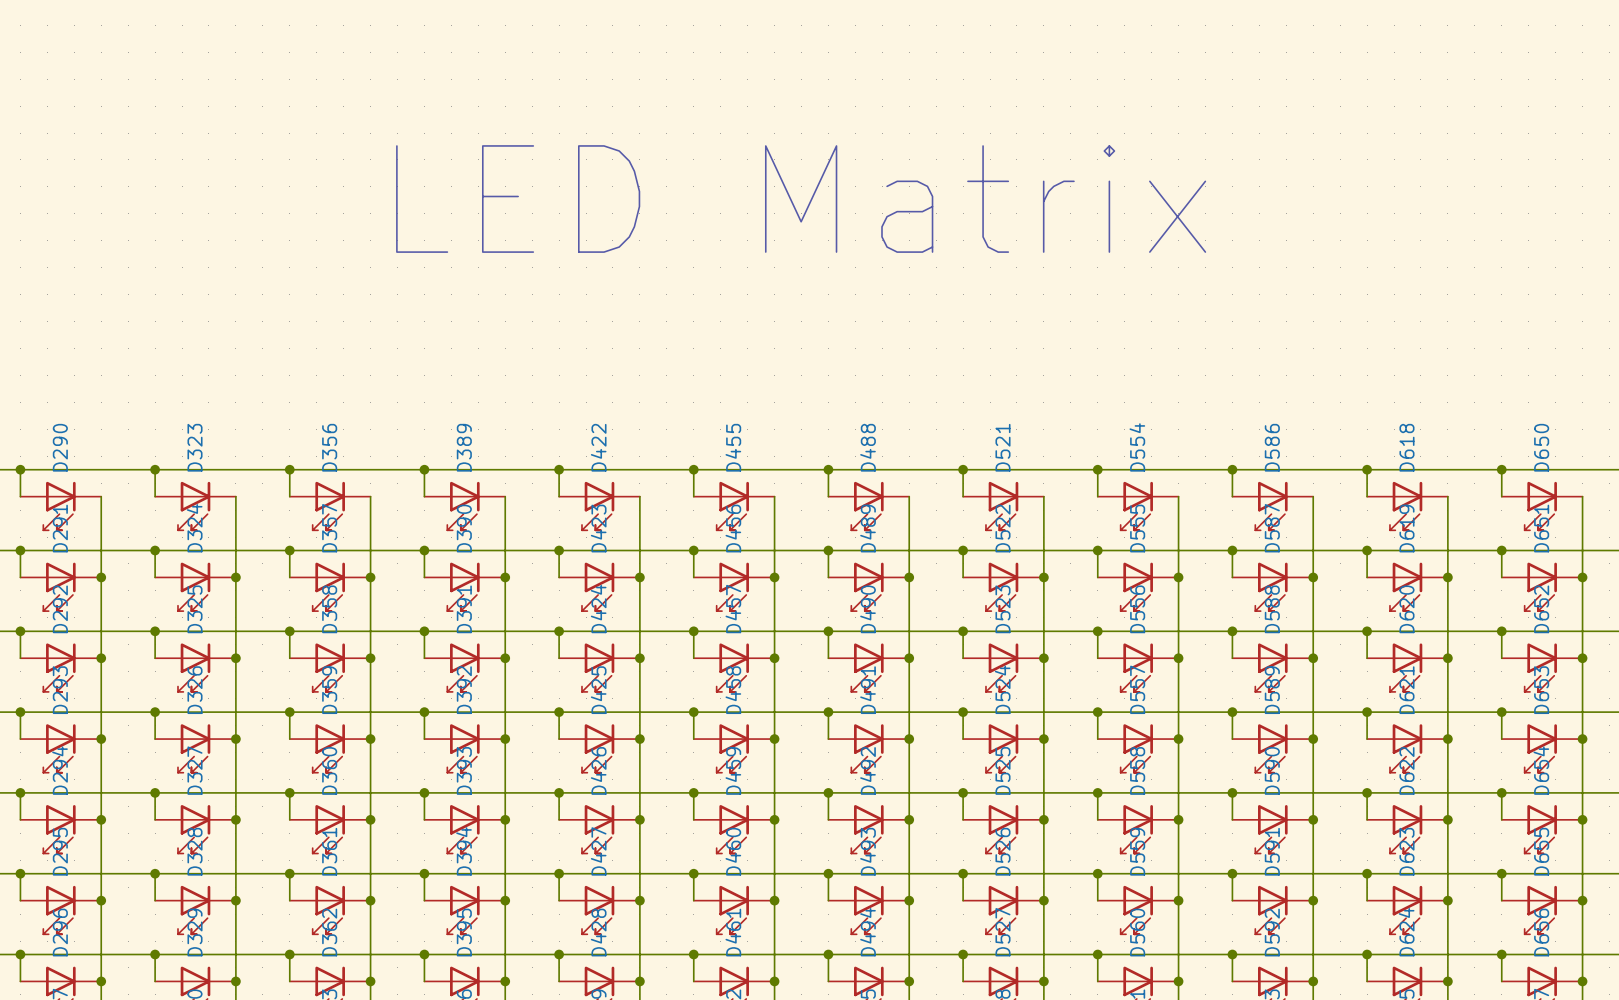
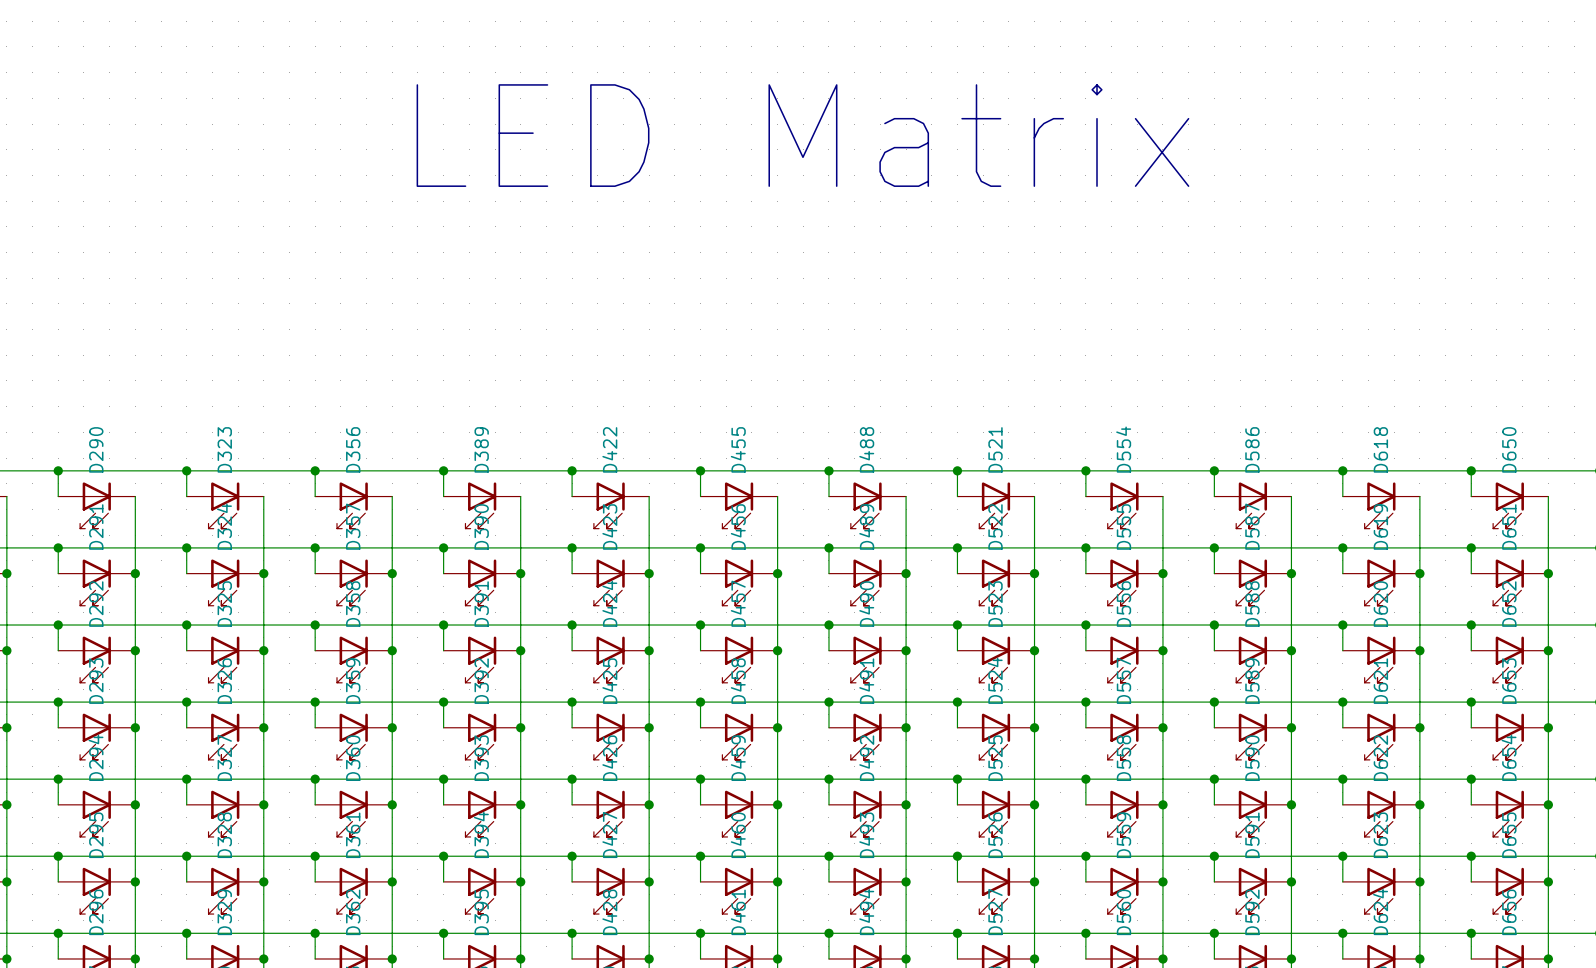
text position: LED Matrix (801, 199) -> LED Matrix (802, 135)

